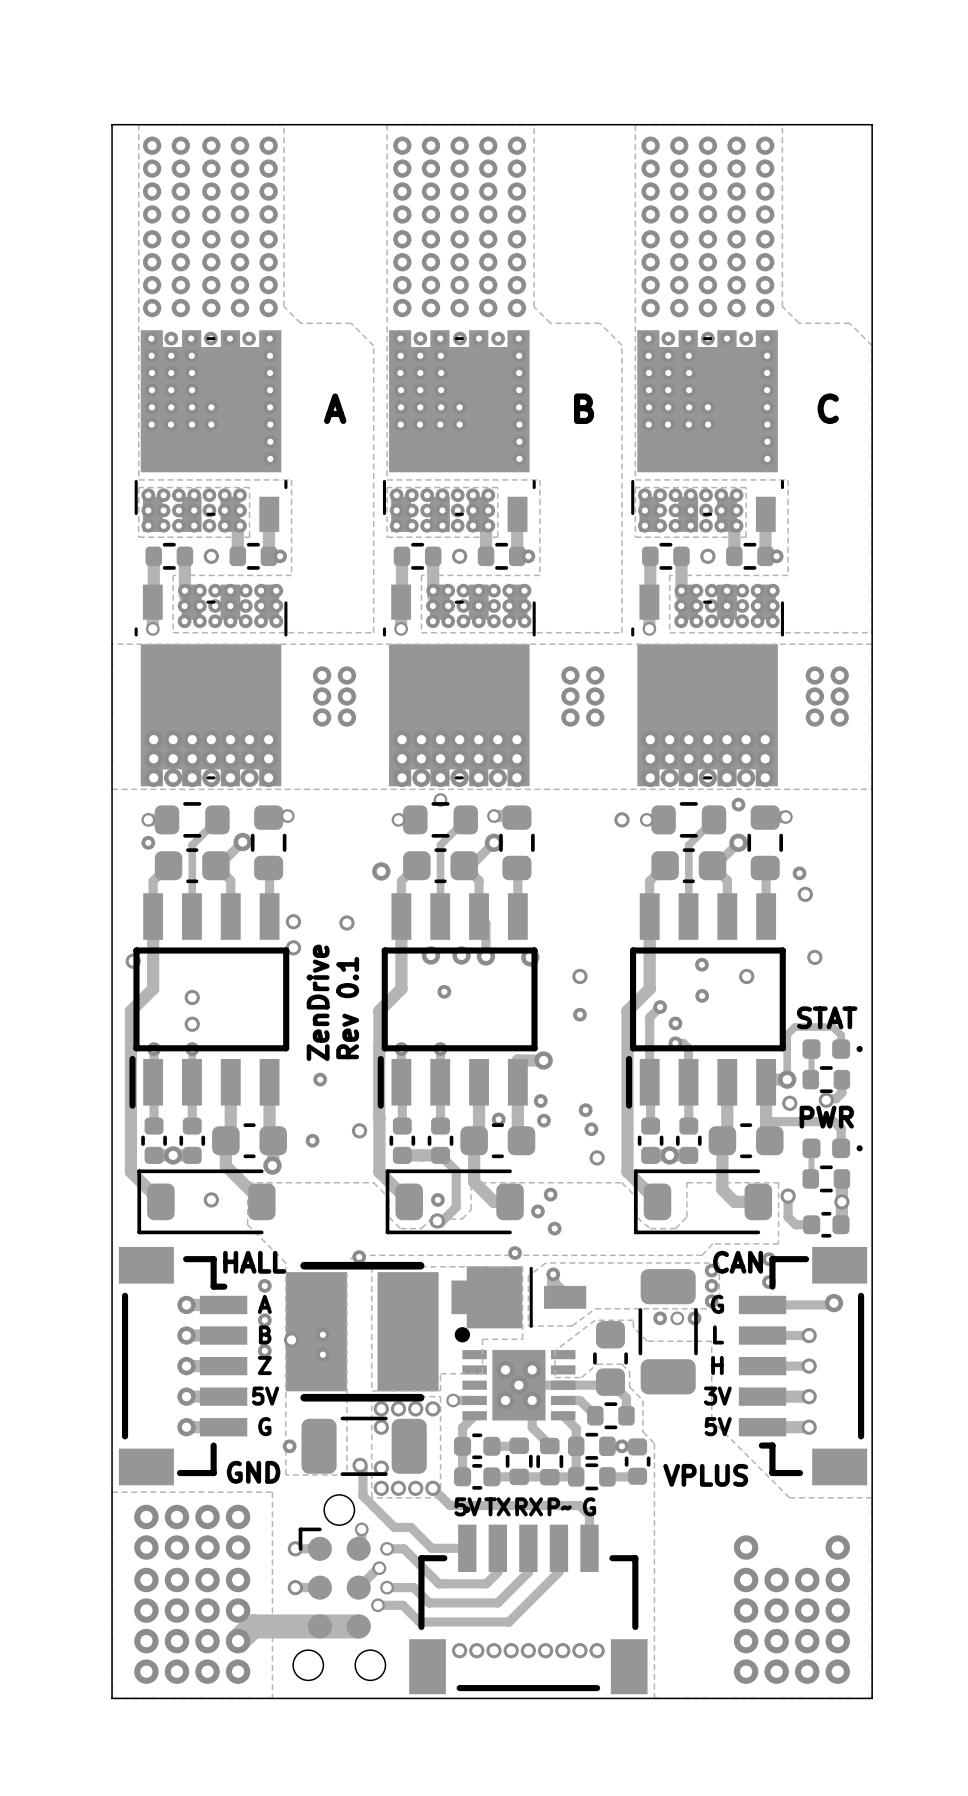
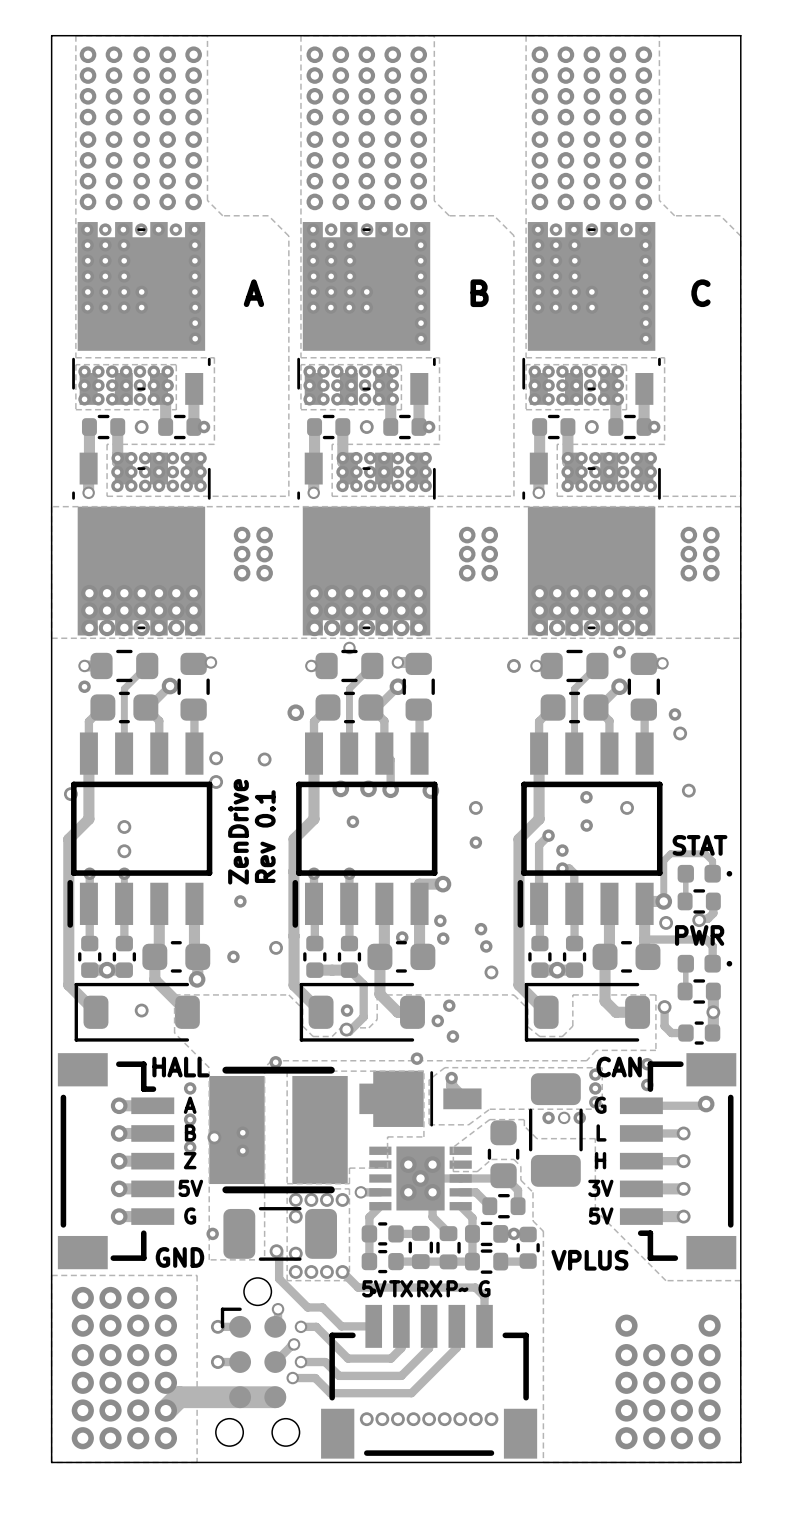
part footprint: [454, 1327, 576, 1421] -> [365, 1136, 472, 1211]

